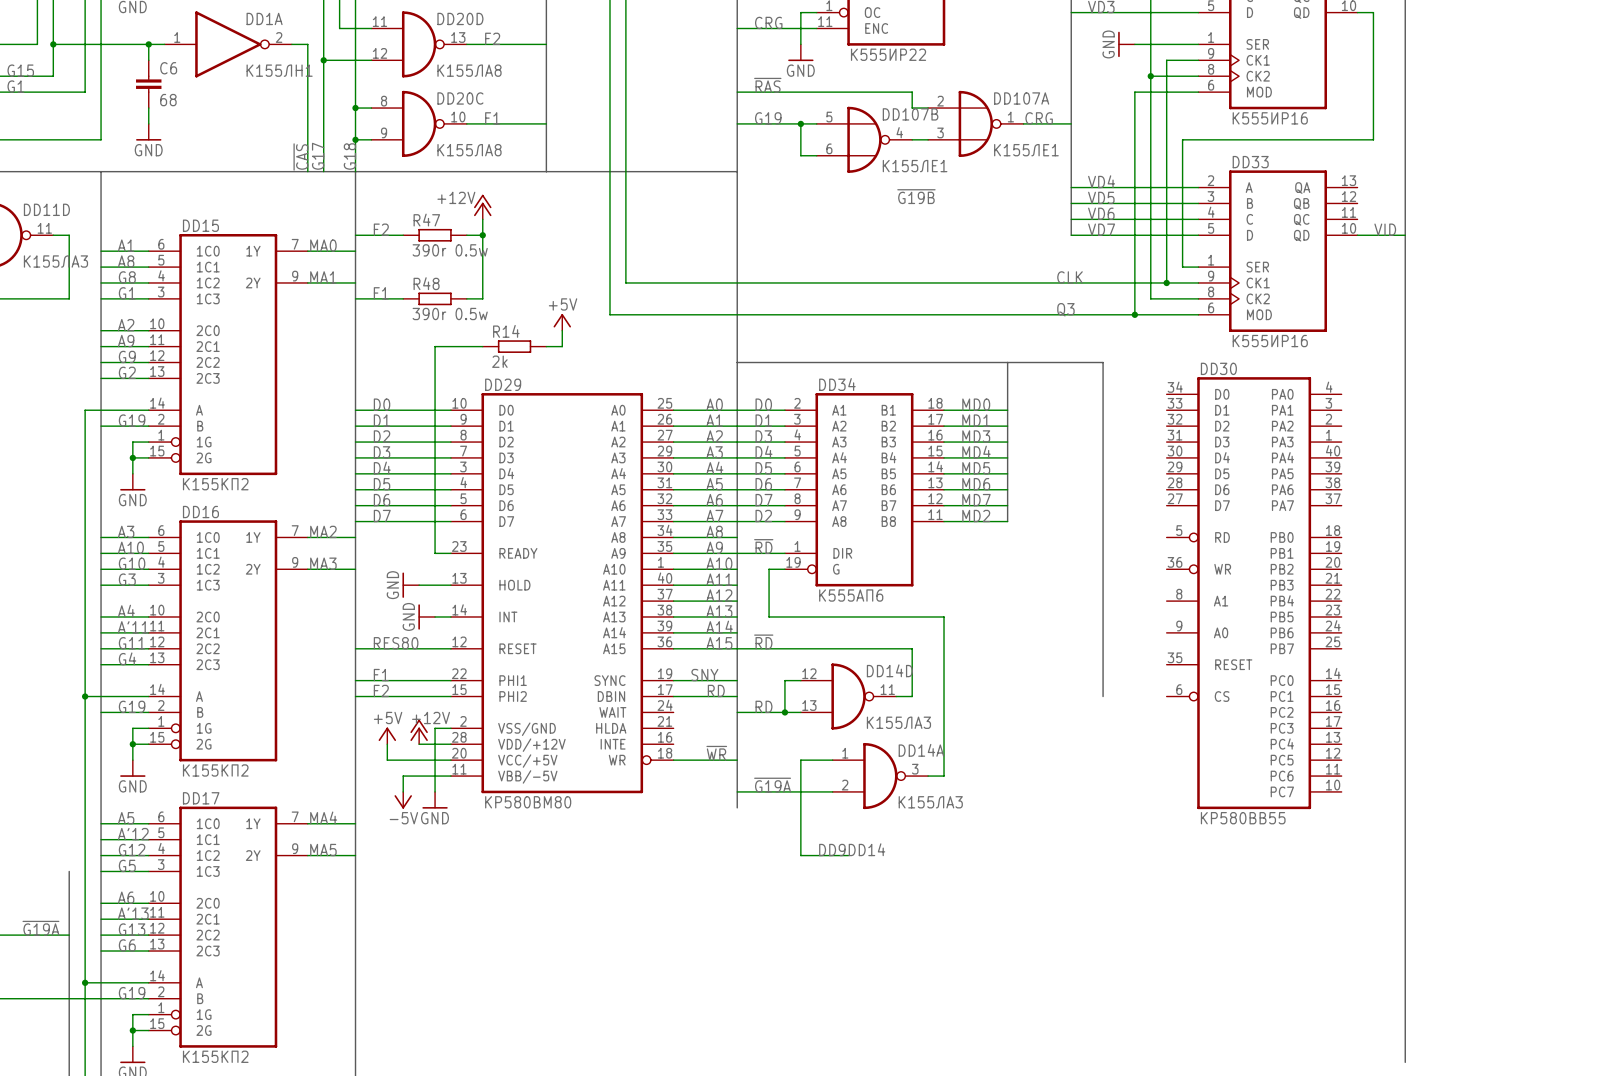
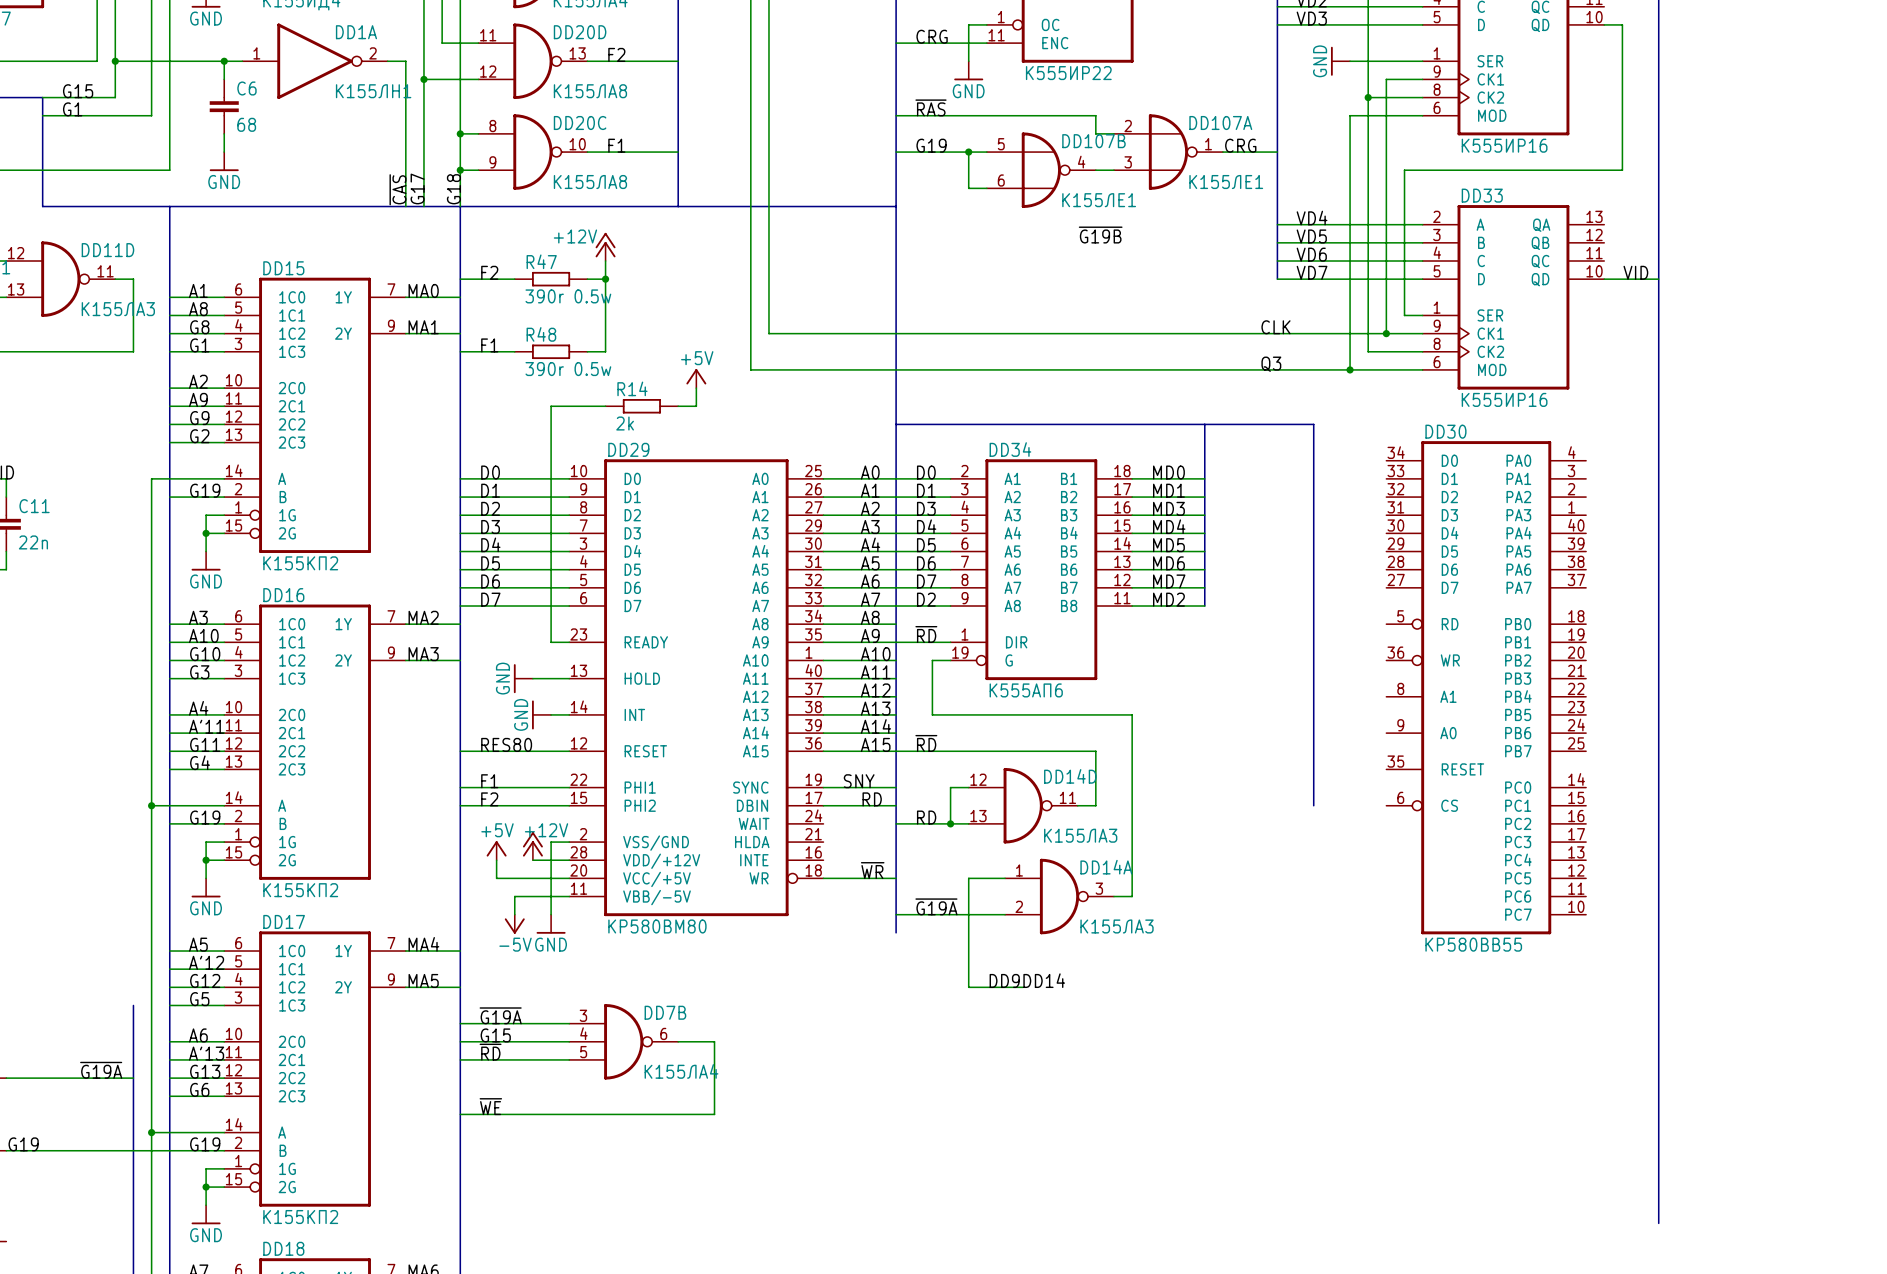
label: none -> ~{G19A} (500, 1015)
wire: none -> (460, 1023) (569, 1023)
label: none -> G15 (495, 1035)
wire: none -> (460, 1041) (569, 1041)
DD7B: none -> К155ЛА4 (623, 1041)
wire: none -> (678, 1041) (714, 1041) (714, 1114) (460, 1114)
label: none -> ~{RD} (490, 1052)
wire: none -> (460, 1059) (569, 1059)
label: none -> ~{WE} (490, 1106)

